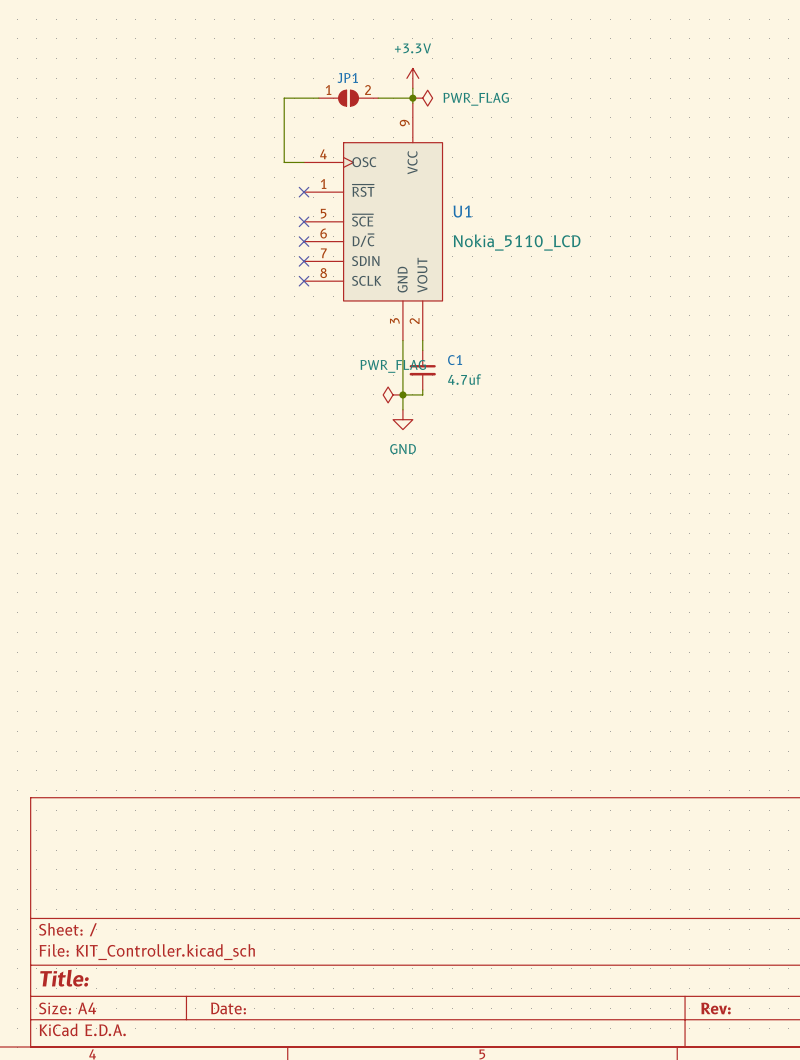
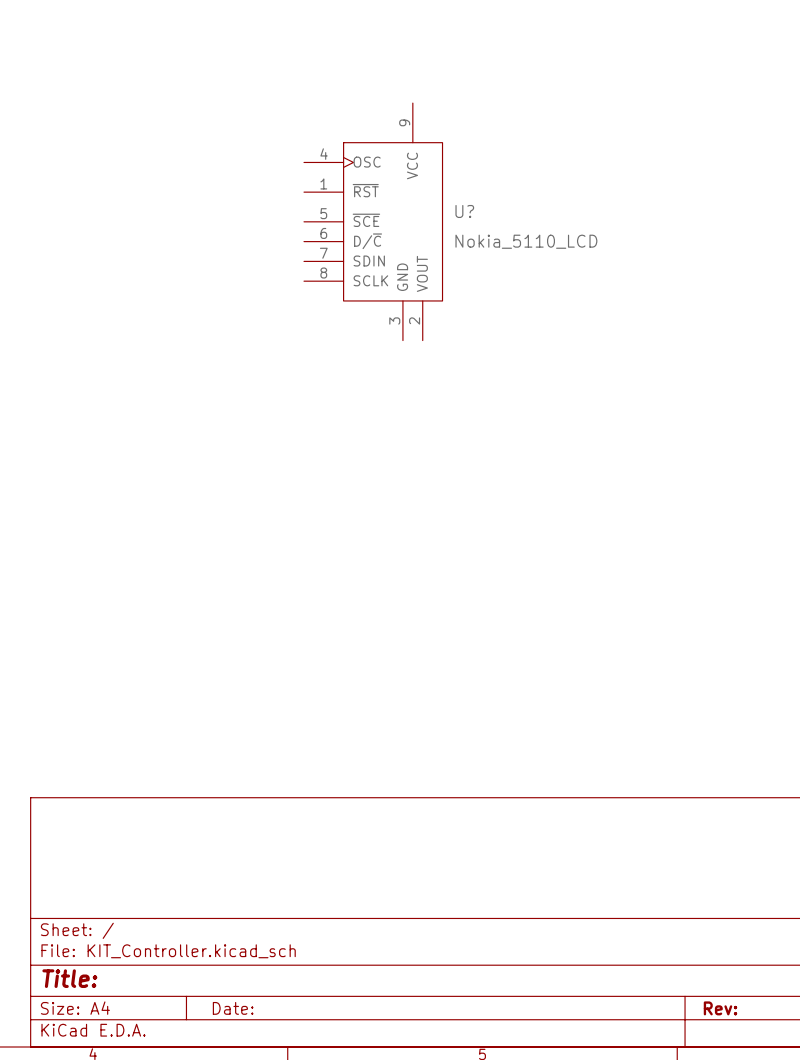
power symbol: +3.3V (412, 78) -> none
wire: (412, 88) (412, 103) -> none
wire: (318, 98) (284, 98) (284, 162) (304, 162) -> none
JP1: (348, 98) -> none
wire: (378, 98) (412, 98) -> none
junction: (412, 98) -> none
power symbol: PWR_FLAG (422, 98) -> none
no-connect mark: (304, 192) -> none
U1 name: U1 (462, 211) -> U? (464, 211)
no-connect mark: (304, 221) -> none
no-connect mark: (304, 241) -> none
no-connect mark: (304, 261) -> none
no-connect mark: (304, 281) -> none
wire: (402, 340) (402, 409) -> none
wire: (422, 340) (422, 350) -> none
C1: 4.7uf (422, 370) -> none
wire: (422, 390) (422, 394) (402, 394) -> none
power symbol: PWR_FLAG (393, 394) -> none
junction: (402, 394) -> none
power symbol: GND (402, 419) -> none

